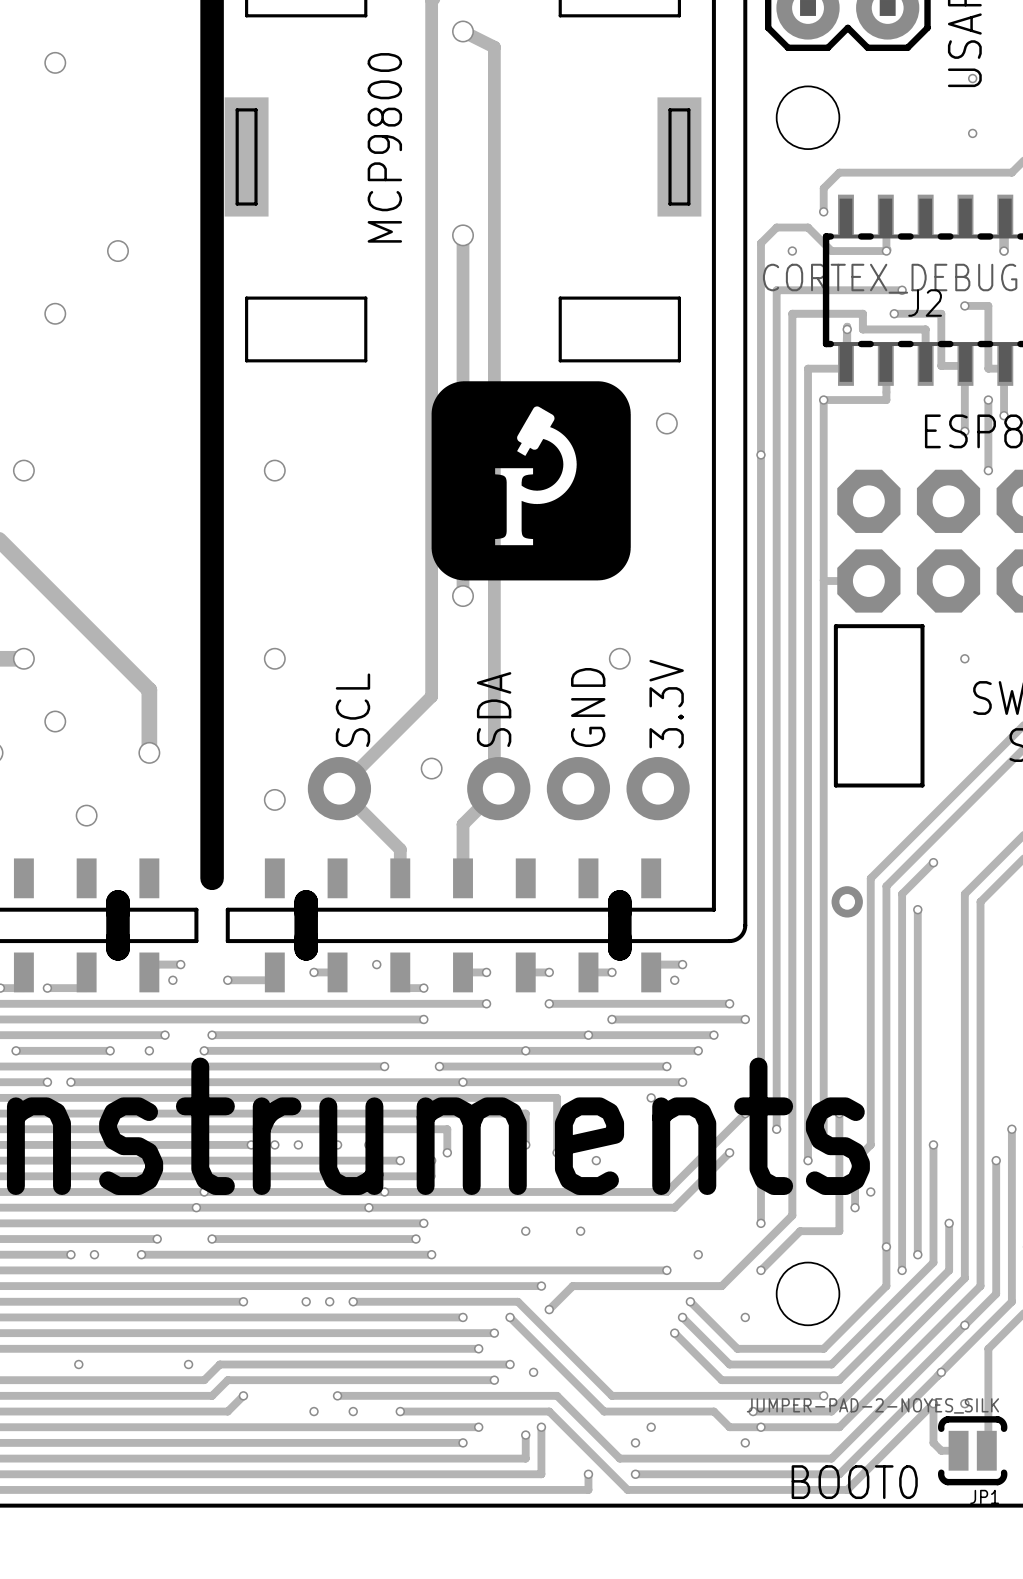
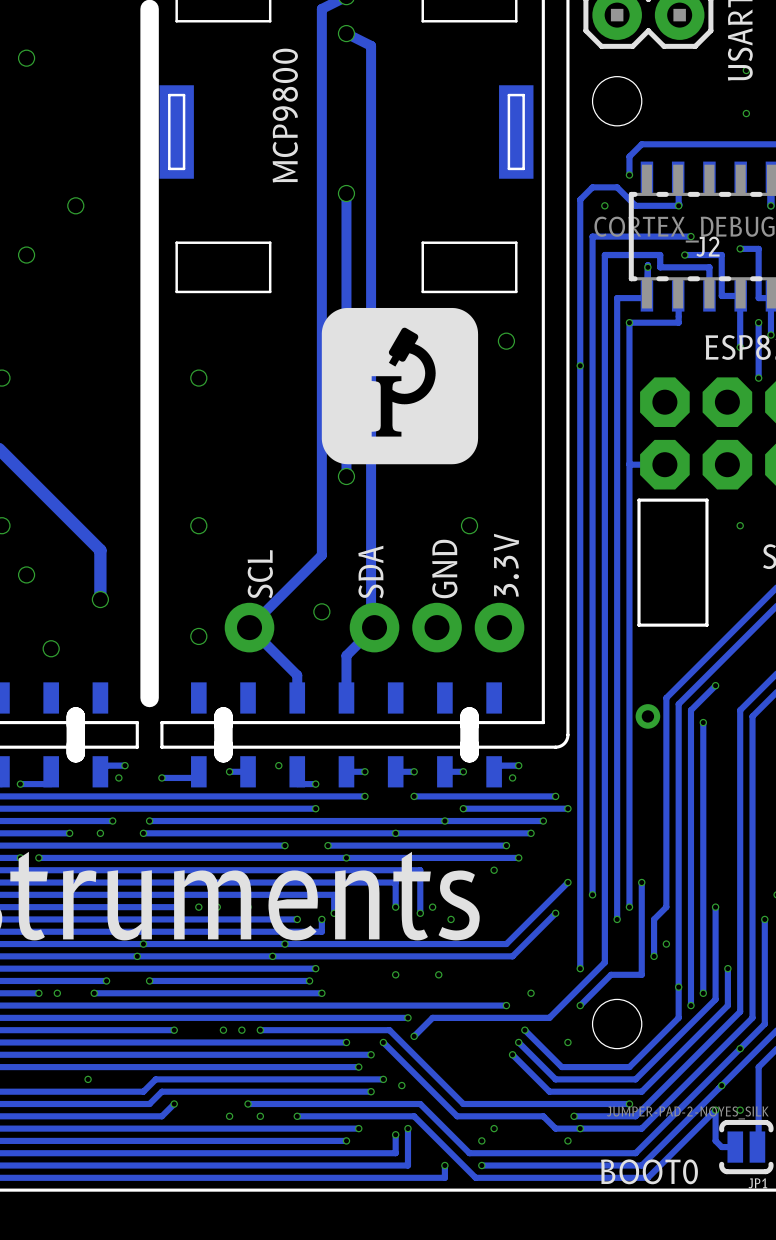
via: (78, 1364) -> none
via: none -> (88, 1079)
via: (188, 1364) -> none

